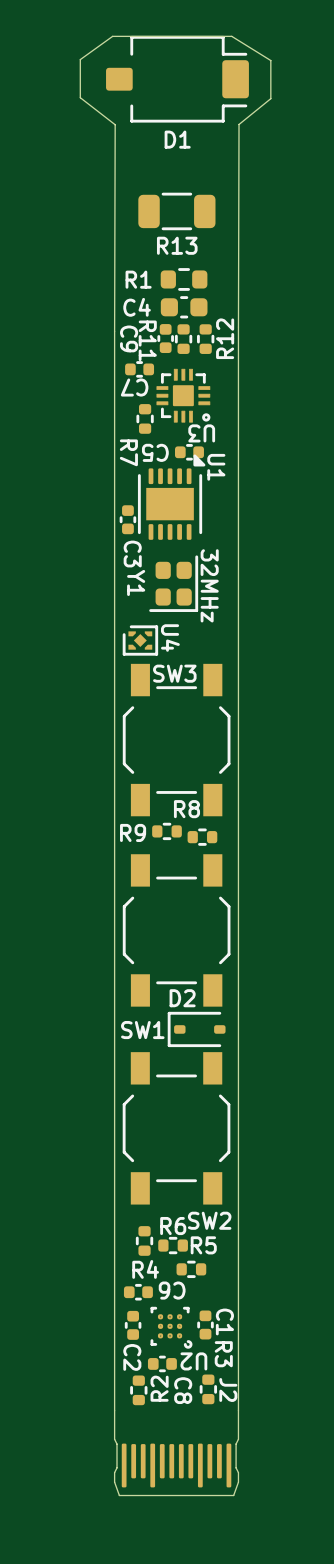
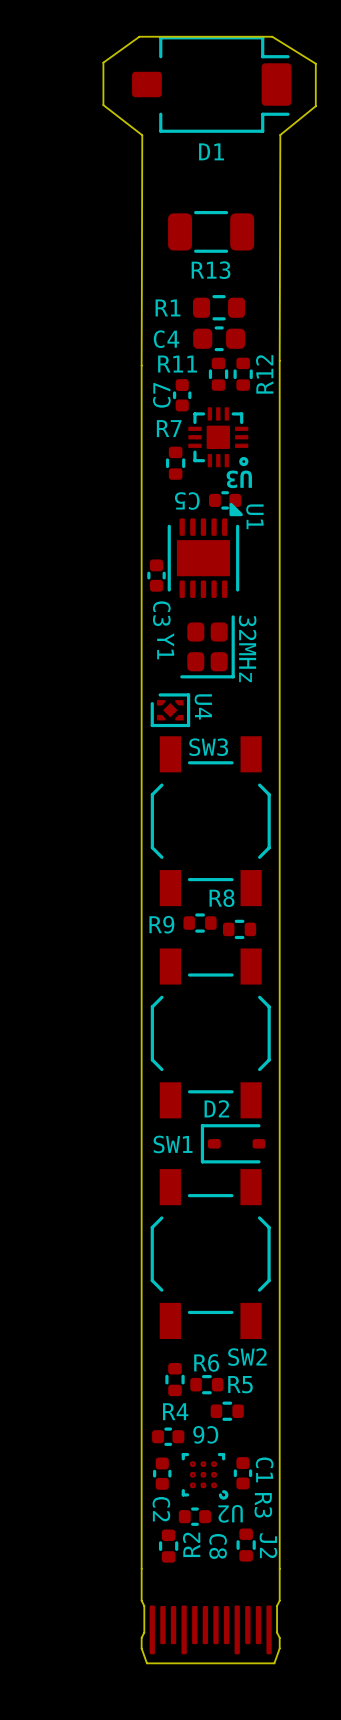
C9: (165, 338) -> none
R11 name rotation: 0° (147, 340) -> 90° counterclockwise (177, 364)
C7 rotation: 0° (139, 369) -> 90° clockwise (182, 395)
R7 name rotation: 0° (128, 452) -> 90° counterclockwise (169, 428)
R7 name position: R7 (128, 452) -> R7 (169, 428)

